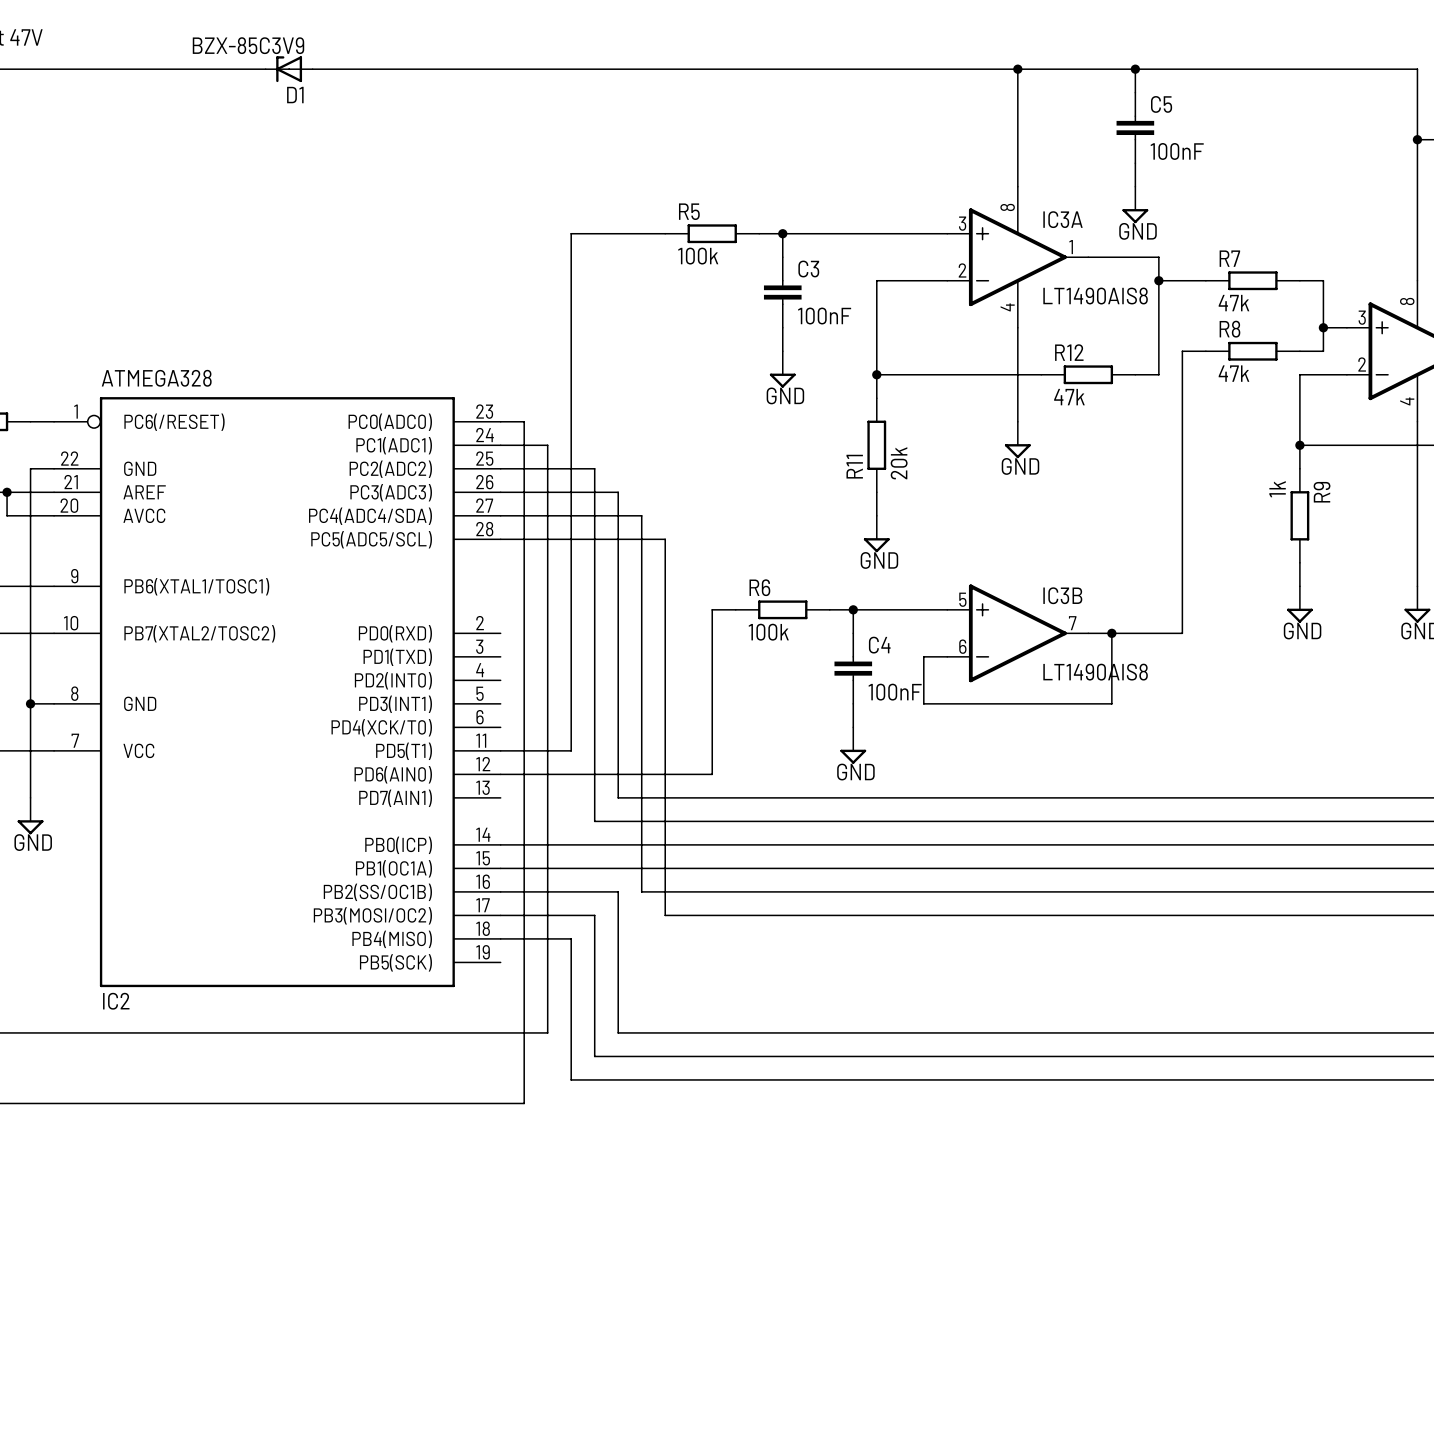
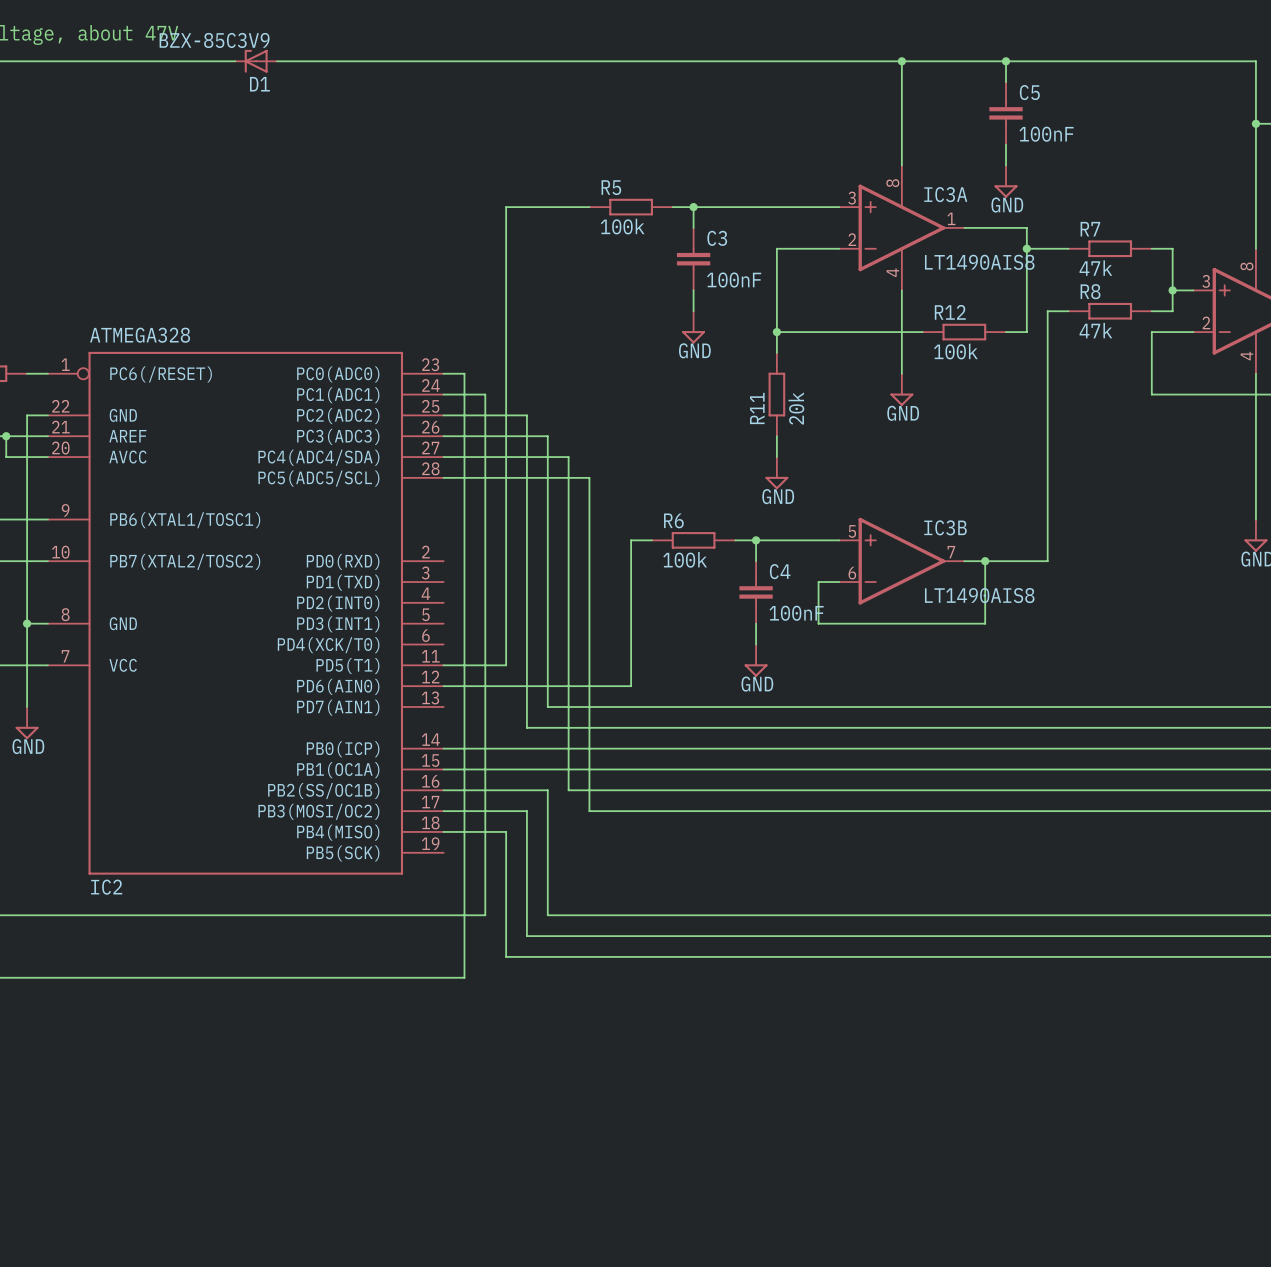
R12 value: 47k (1069, 397) -> 100k (955, 351)
wire: (1299, 445) (1299, 468) -> none
junction: (1299, 445) -> none
R9: 1k (1299, 515) -> none
wire: (1299, 562) (1299, 586) -> none
power symbol: GND (1299, 604) -> none

